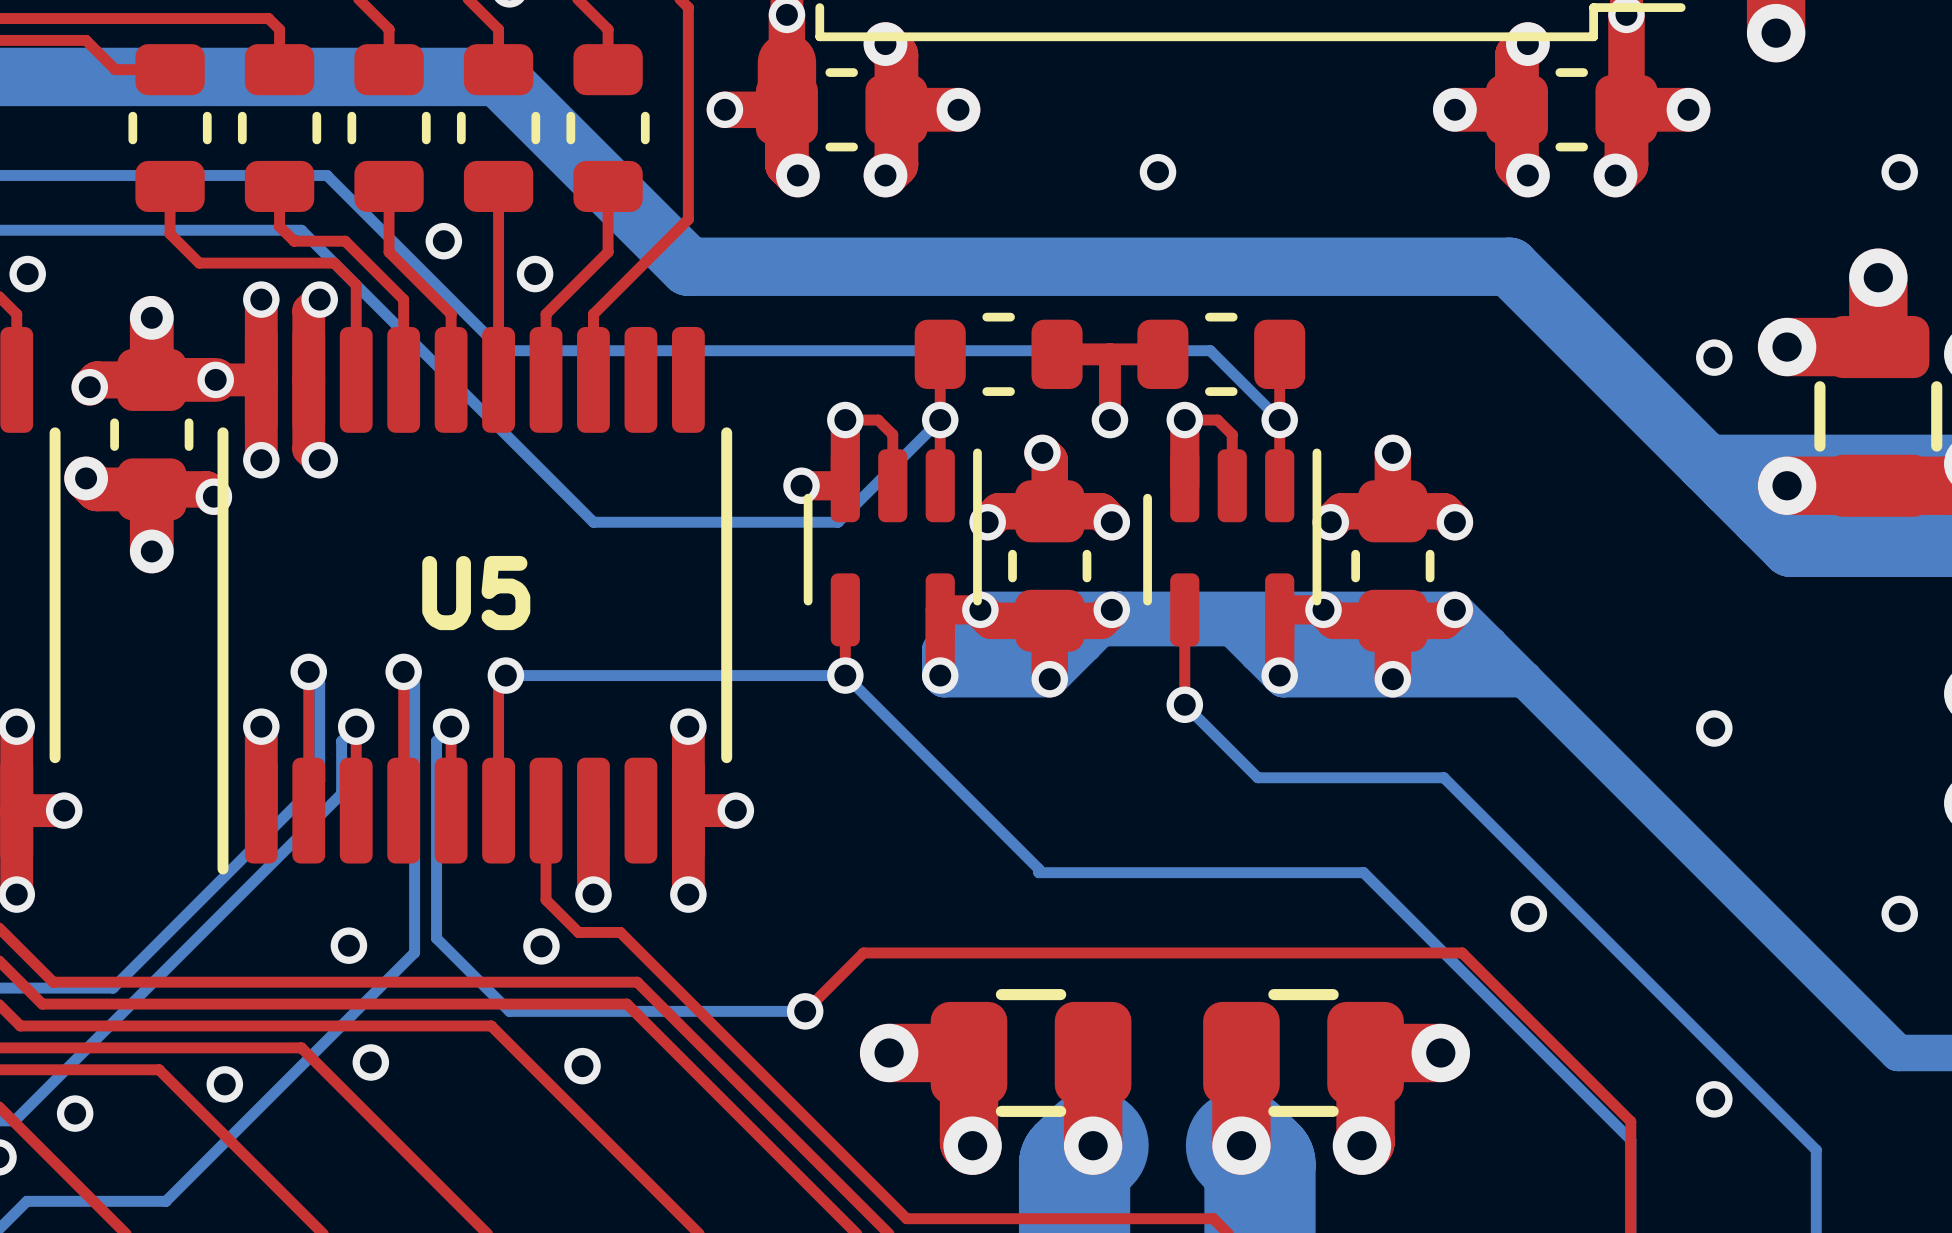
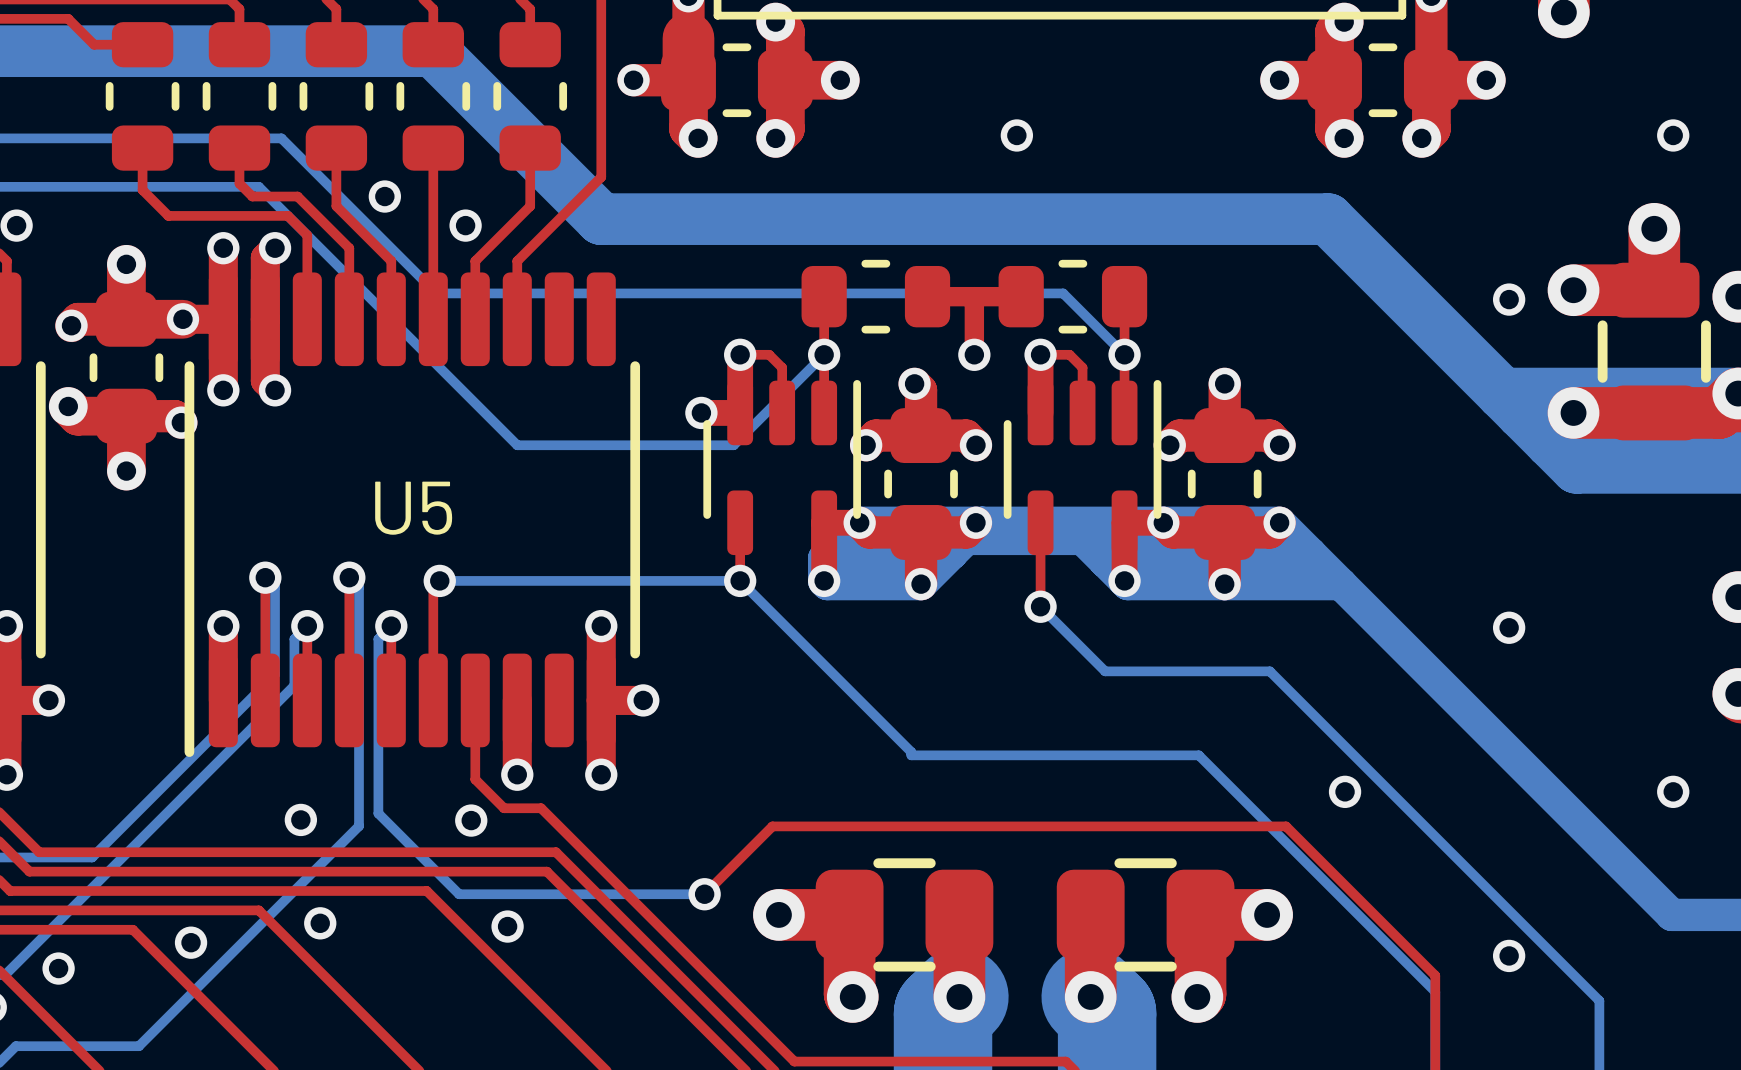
top track: (881, 952) (863, 952) (805, 1011) -> (772, 826) (704, 894)
bottom track: (509, 1011) (805, 1011) -> (442, 878) (459, 894) (704, 894)
via position: (805, 1011) -> (704, 894)

